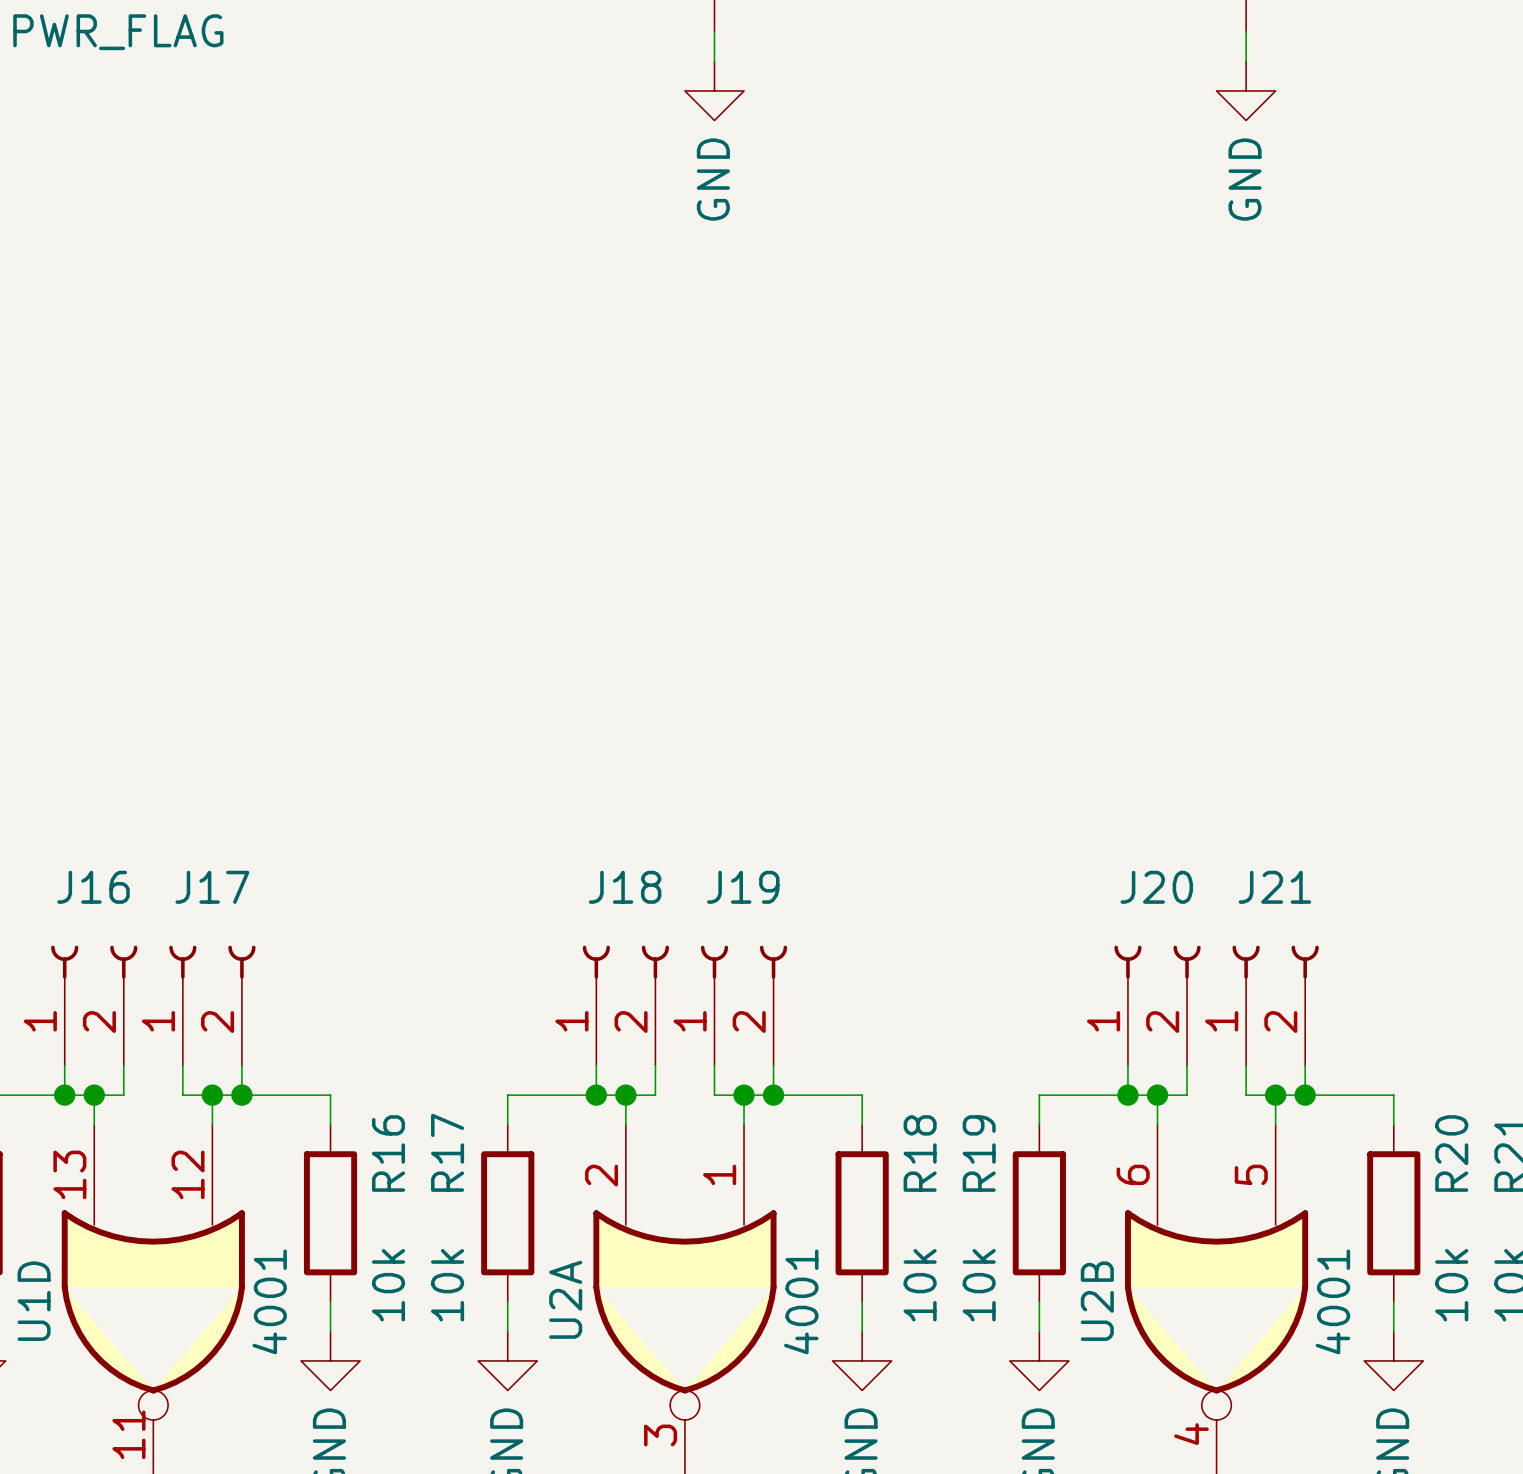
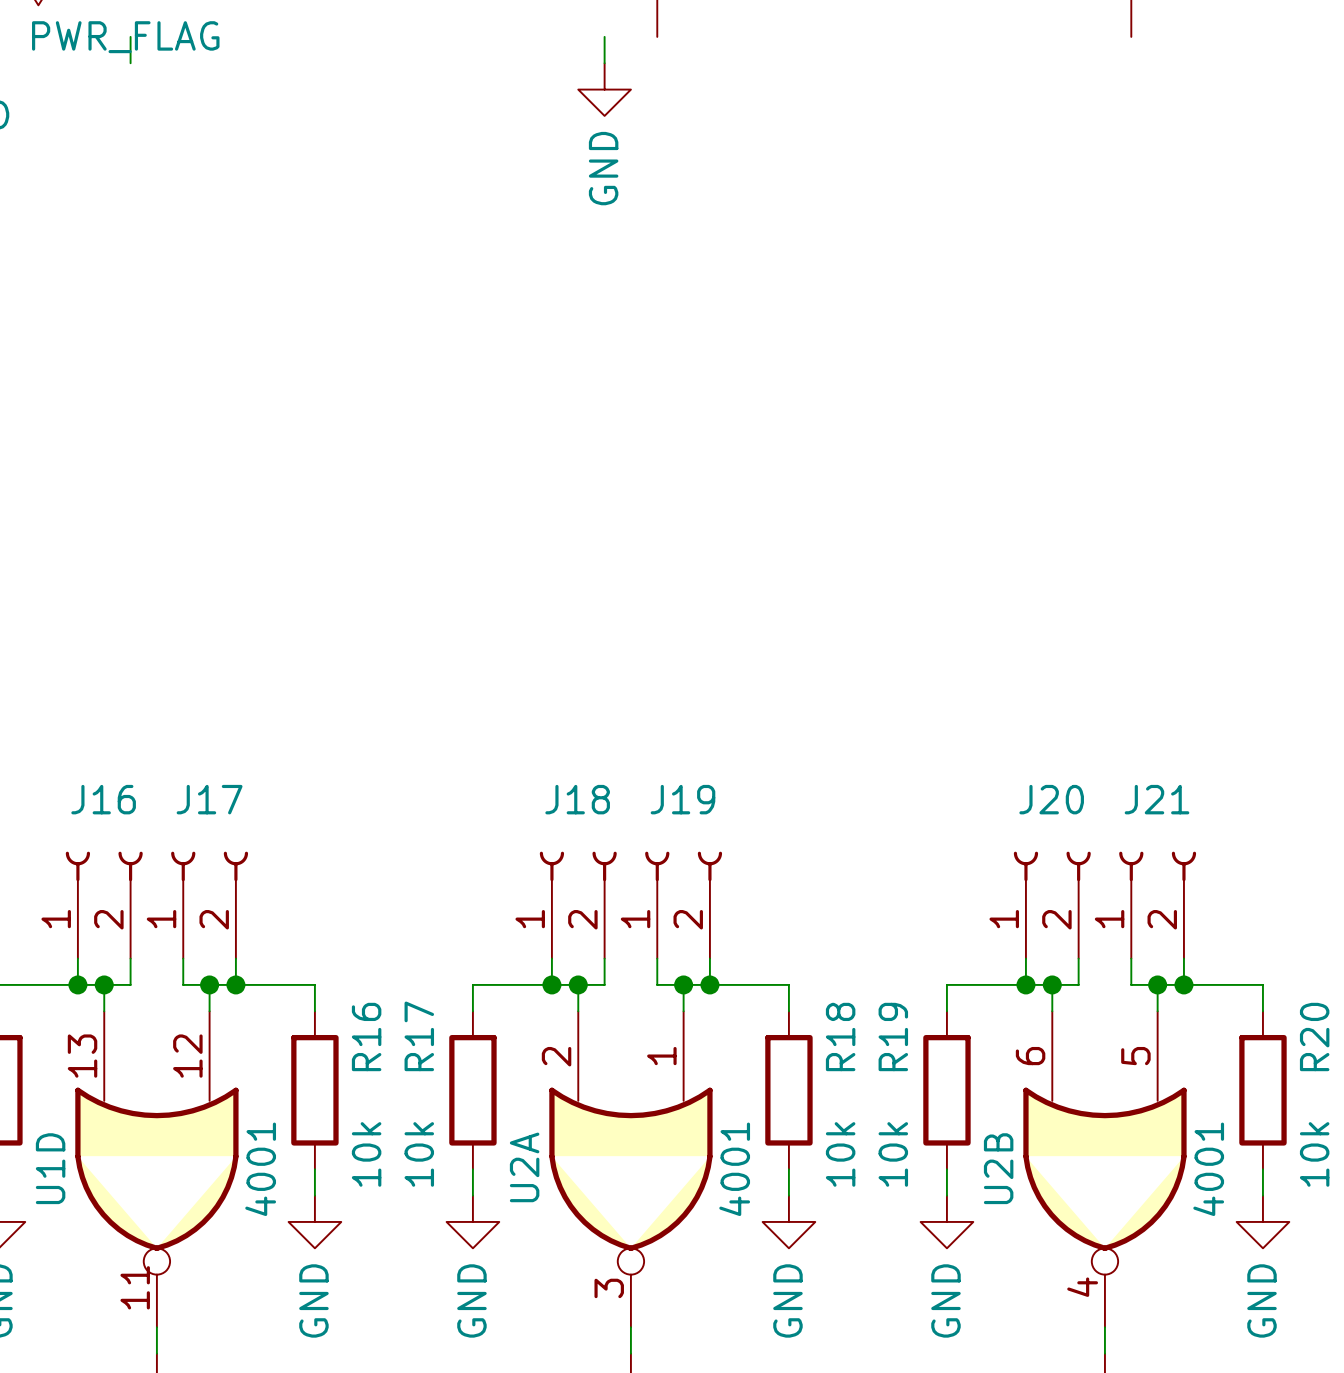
wire: none -> (130, 36) (130, 63)
wire: (714, 31) (714, 61) -> (604, 36) (604, 63)
wire: (1246, 31) (1246, 61) -> none
power symbol position: GND (714, 90) -> GND (604, 89)
power symbol: GND (1246, 90) -> none

